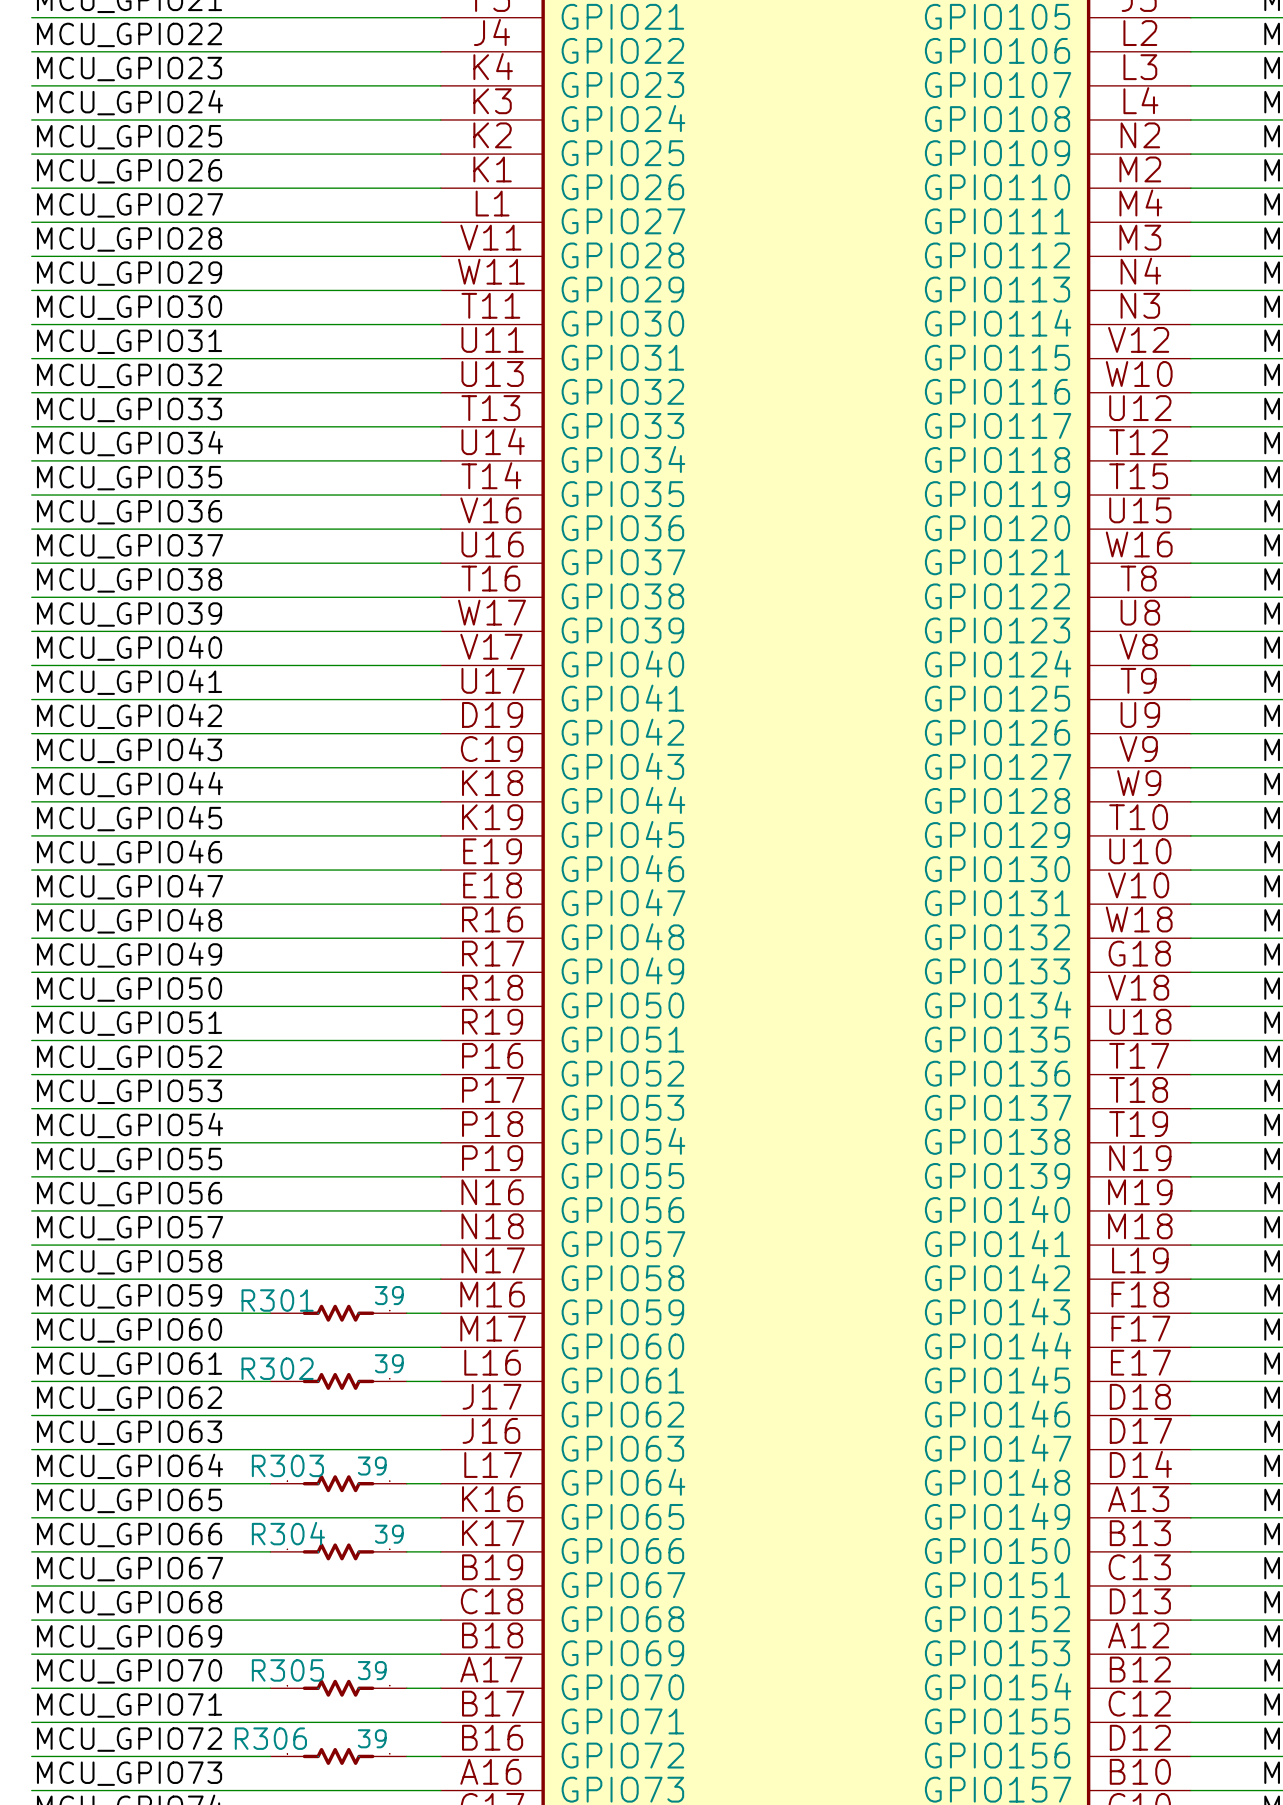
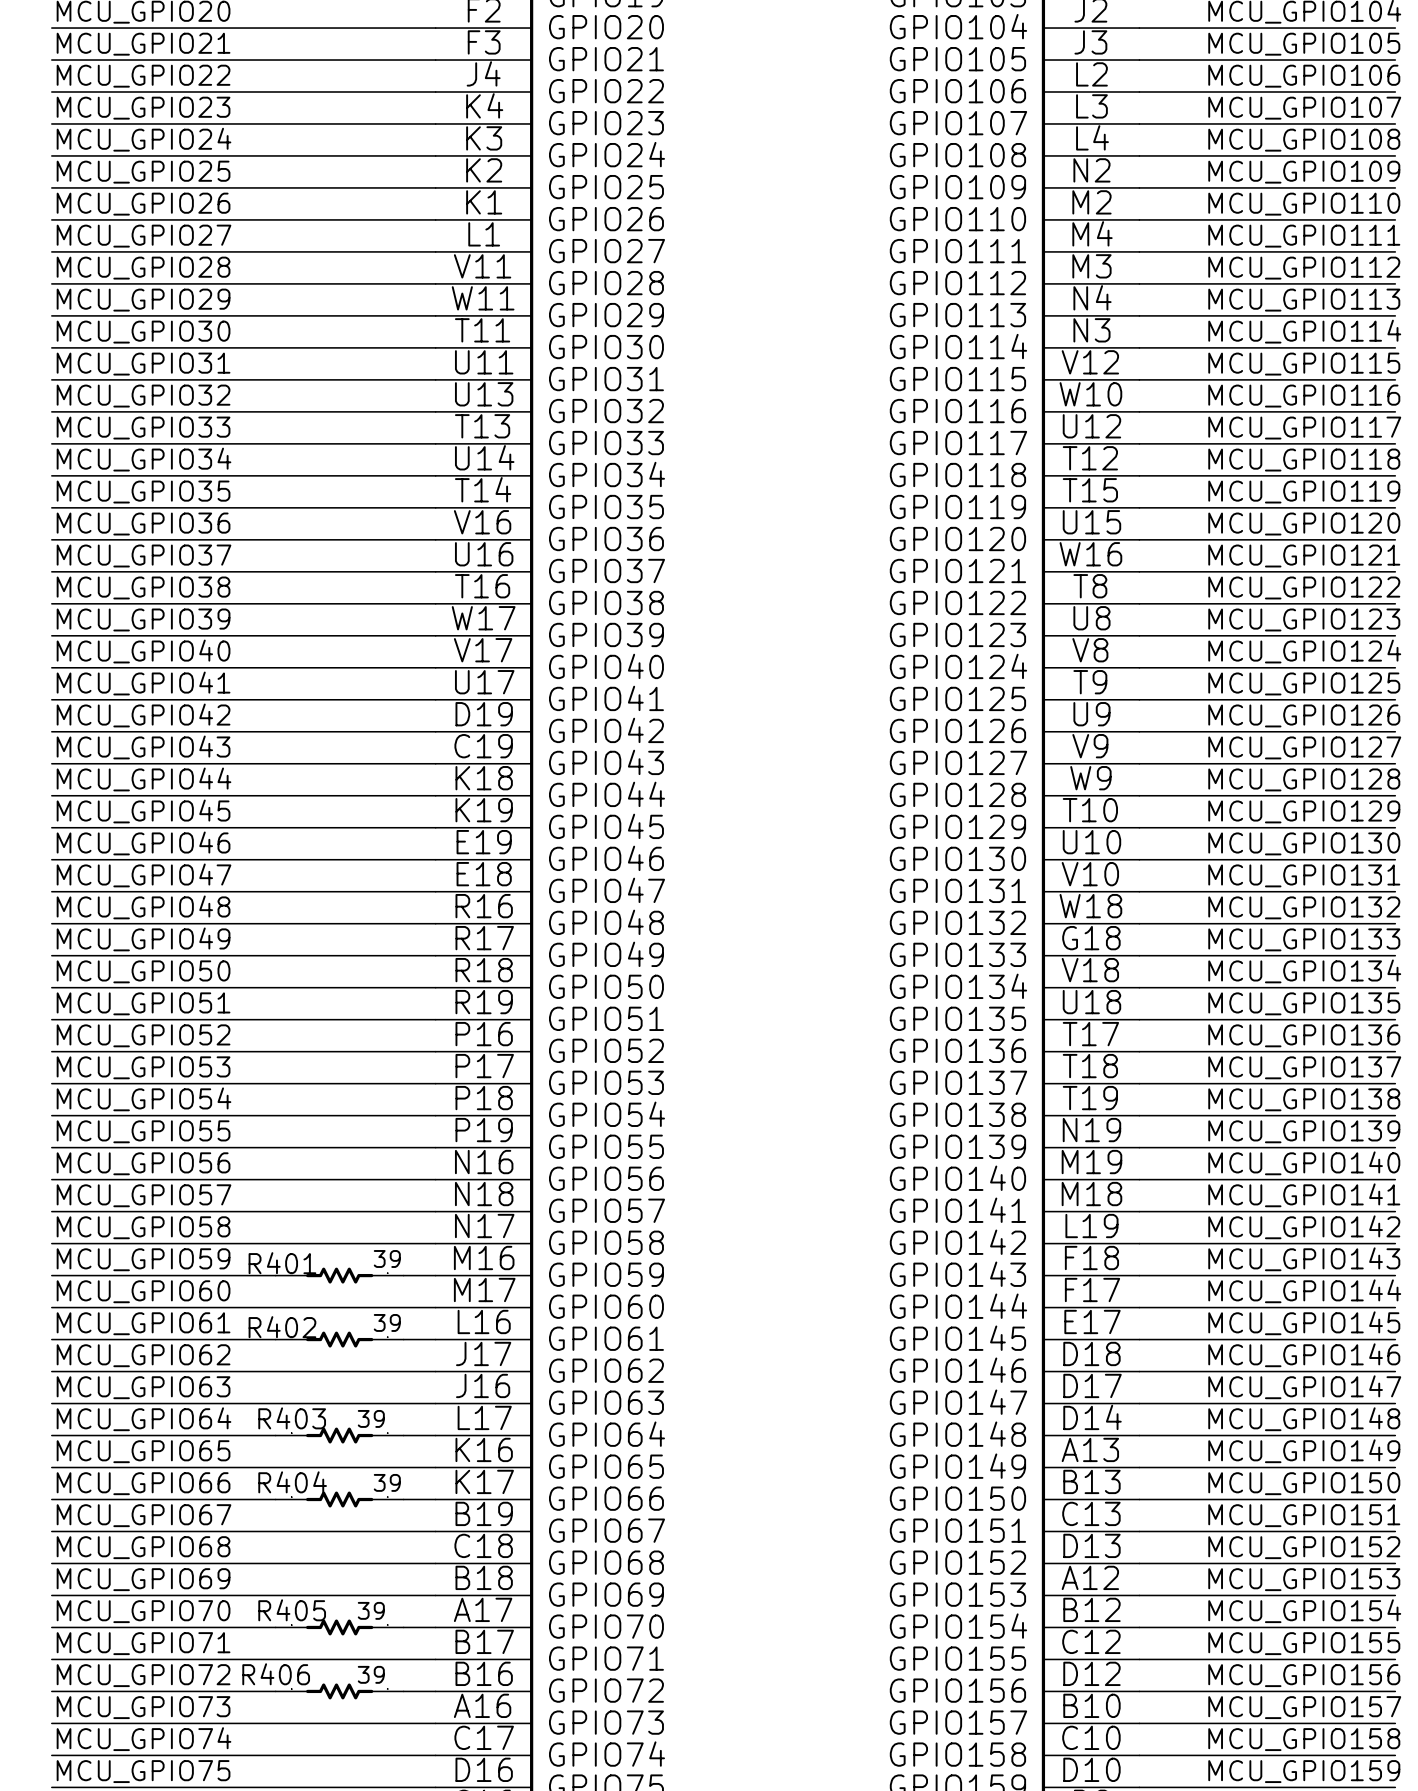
R301 name: R301 (277, 1300) -> R401 (282, 1263)
R302 name: R302 (277, 1368) -> R402 (282, 1327)
R303 name: R303 (287, 1465) -> R403 (292, 1418)
R304 name: R304 (288, 1533) -> R404 (292, 1482)
R305 name: R305 (287, 1670) -> R405 (292, 1610)
R306 name: R306 (270, 1738) -> R406 (276, 1674)

